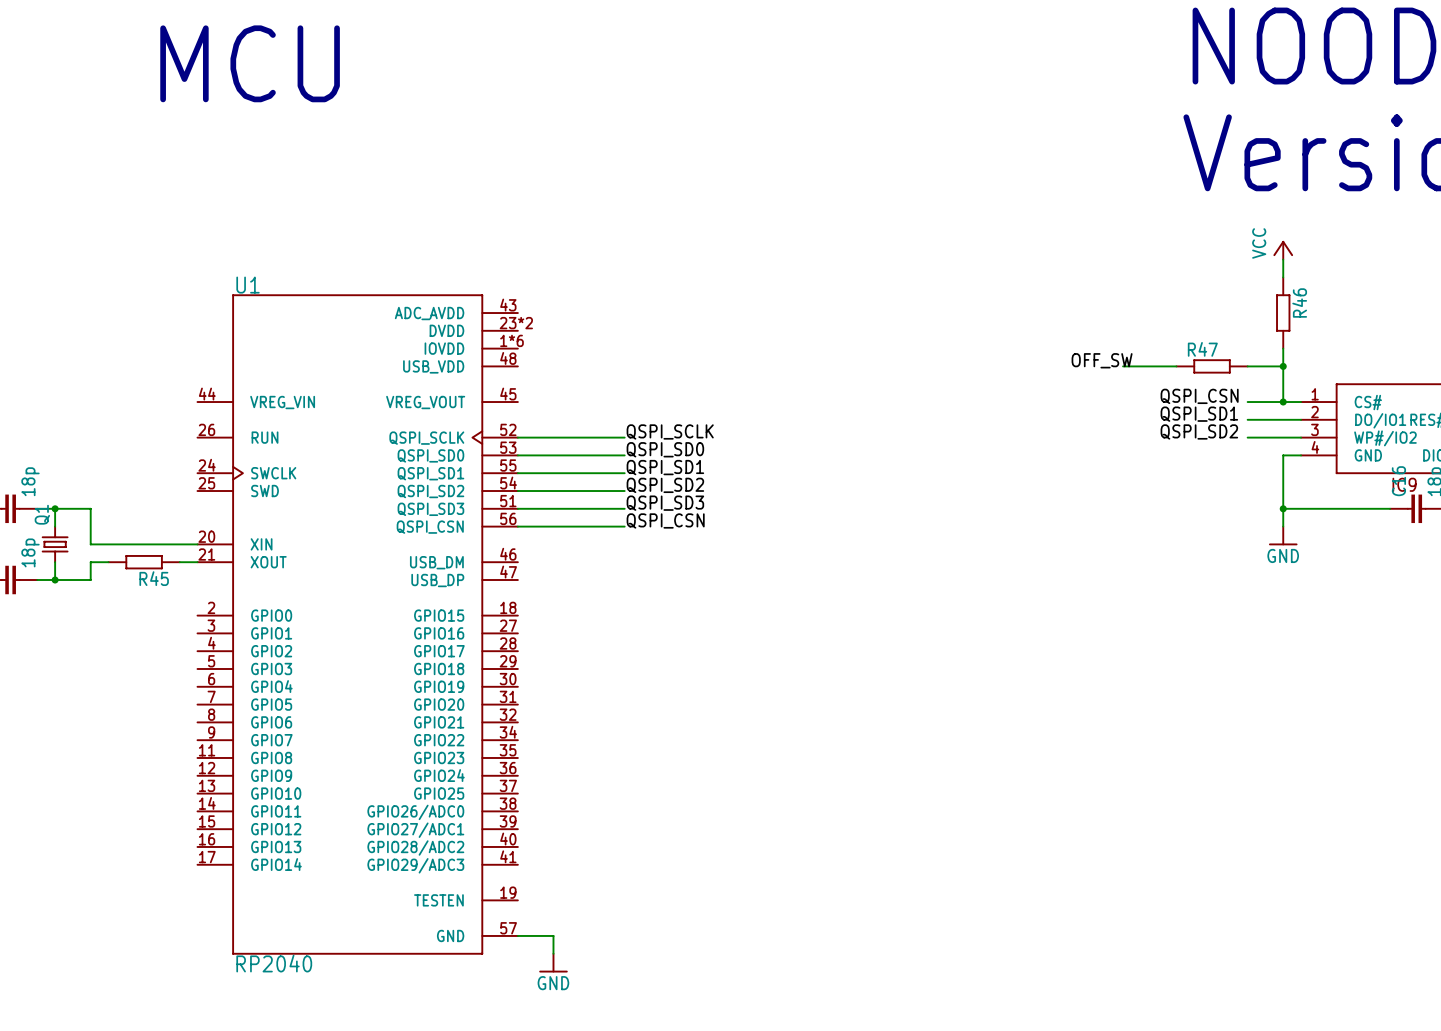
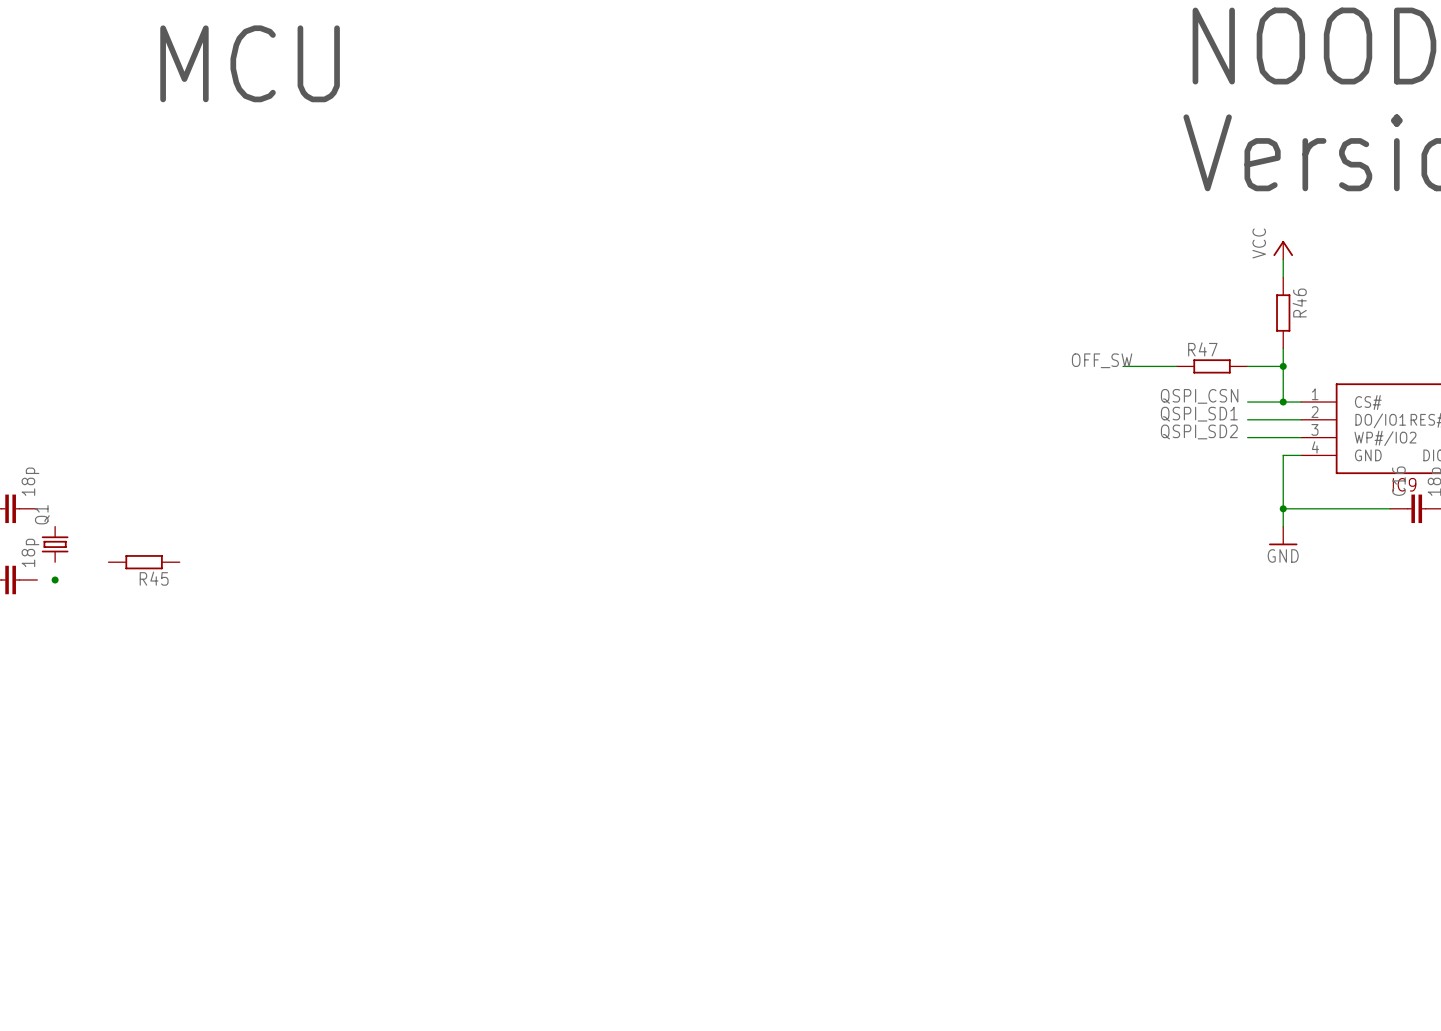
label: QSPI_SCLK (670, 431) -> none
wire: (517, 437) (624, 437) -> none
label: QSPI_SD0 (665, 449) -> none
wire: (517, 455) (624, 455) -> none
label: QSPI_SD1 (665, 467) -> none
wire: (517, 473) (624, 473) -> none
label: QSPI_SD2 (665, 485) -> none
wire: (517, 491) (624, 491) -> none
label: QSPI_SD3 (665, 503) -> none
wire: (37, 508) (90, 508) (90, 544) (197, 544) -> none
wire: (55, 508) (55, 526) -> none
junction: (55, 508) -> none
wire: (517, 508) (624, 508) -> none
label: QSPI_CSN (665, 520) -> none
wire: (517, 526) (624, 526) -> none
wire: (55, 562) (55, 580) -> none
wire: (108, 562) (90, 562) (90, 580) (37, 580) -> none
wire: (179, 562) (197, 562) -> none
U1: RP2040 (357, 624) -> none
wire: (517, 935) (553, 935) (553, 953) -> none
power symbol: GND (553, 963) -> none

